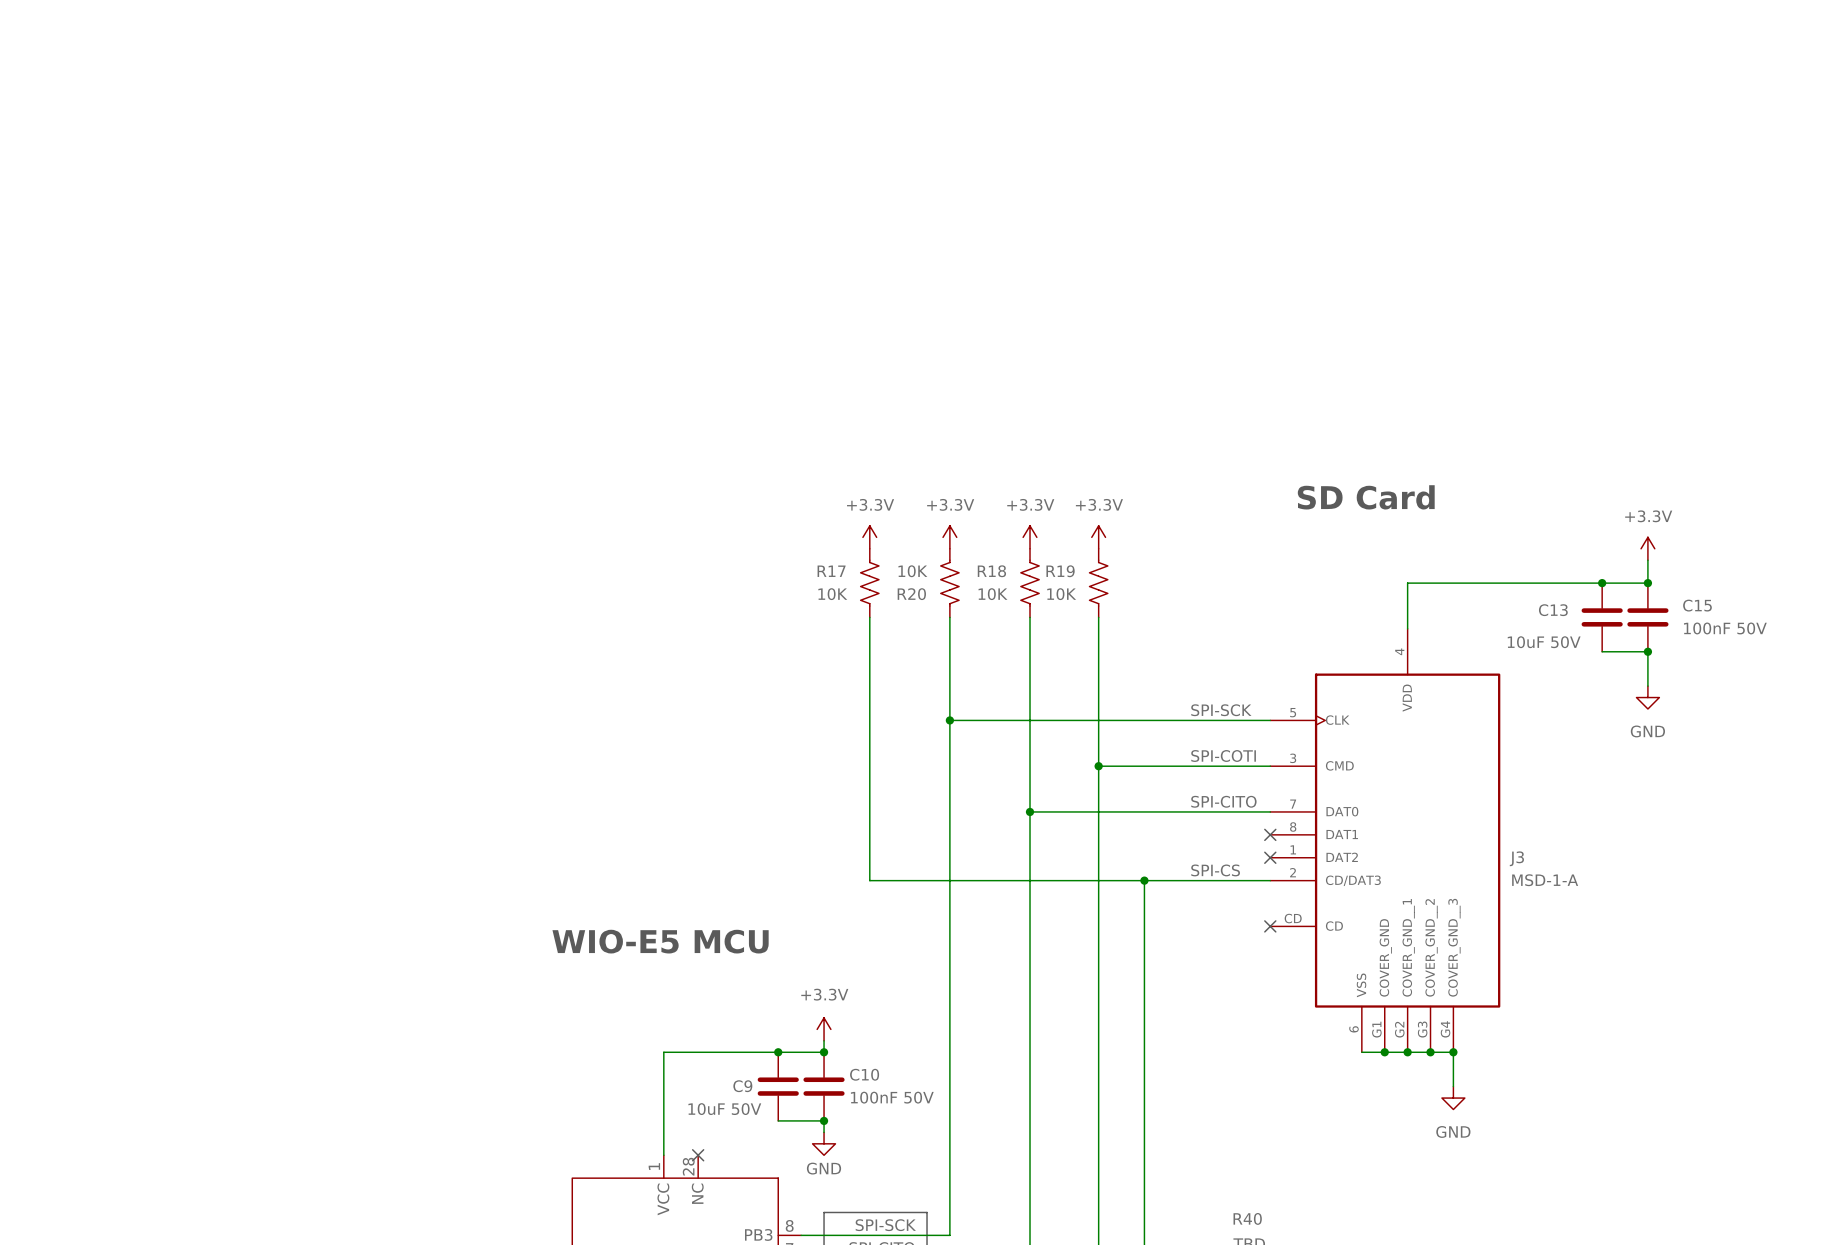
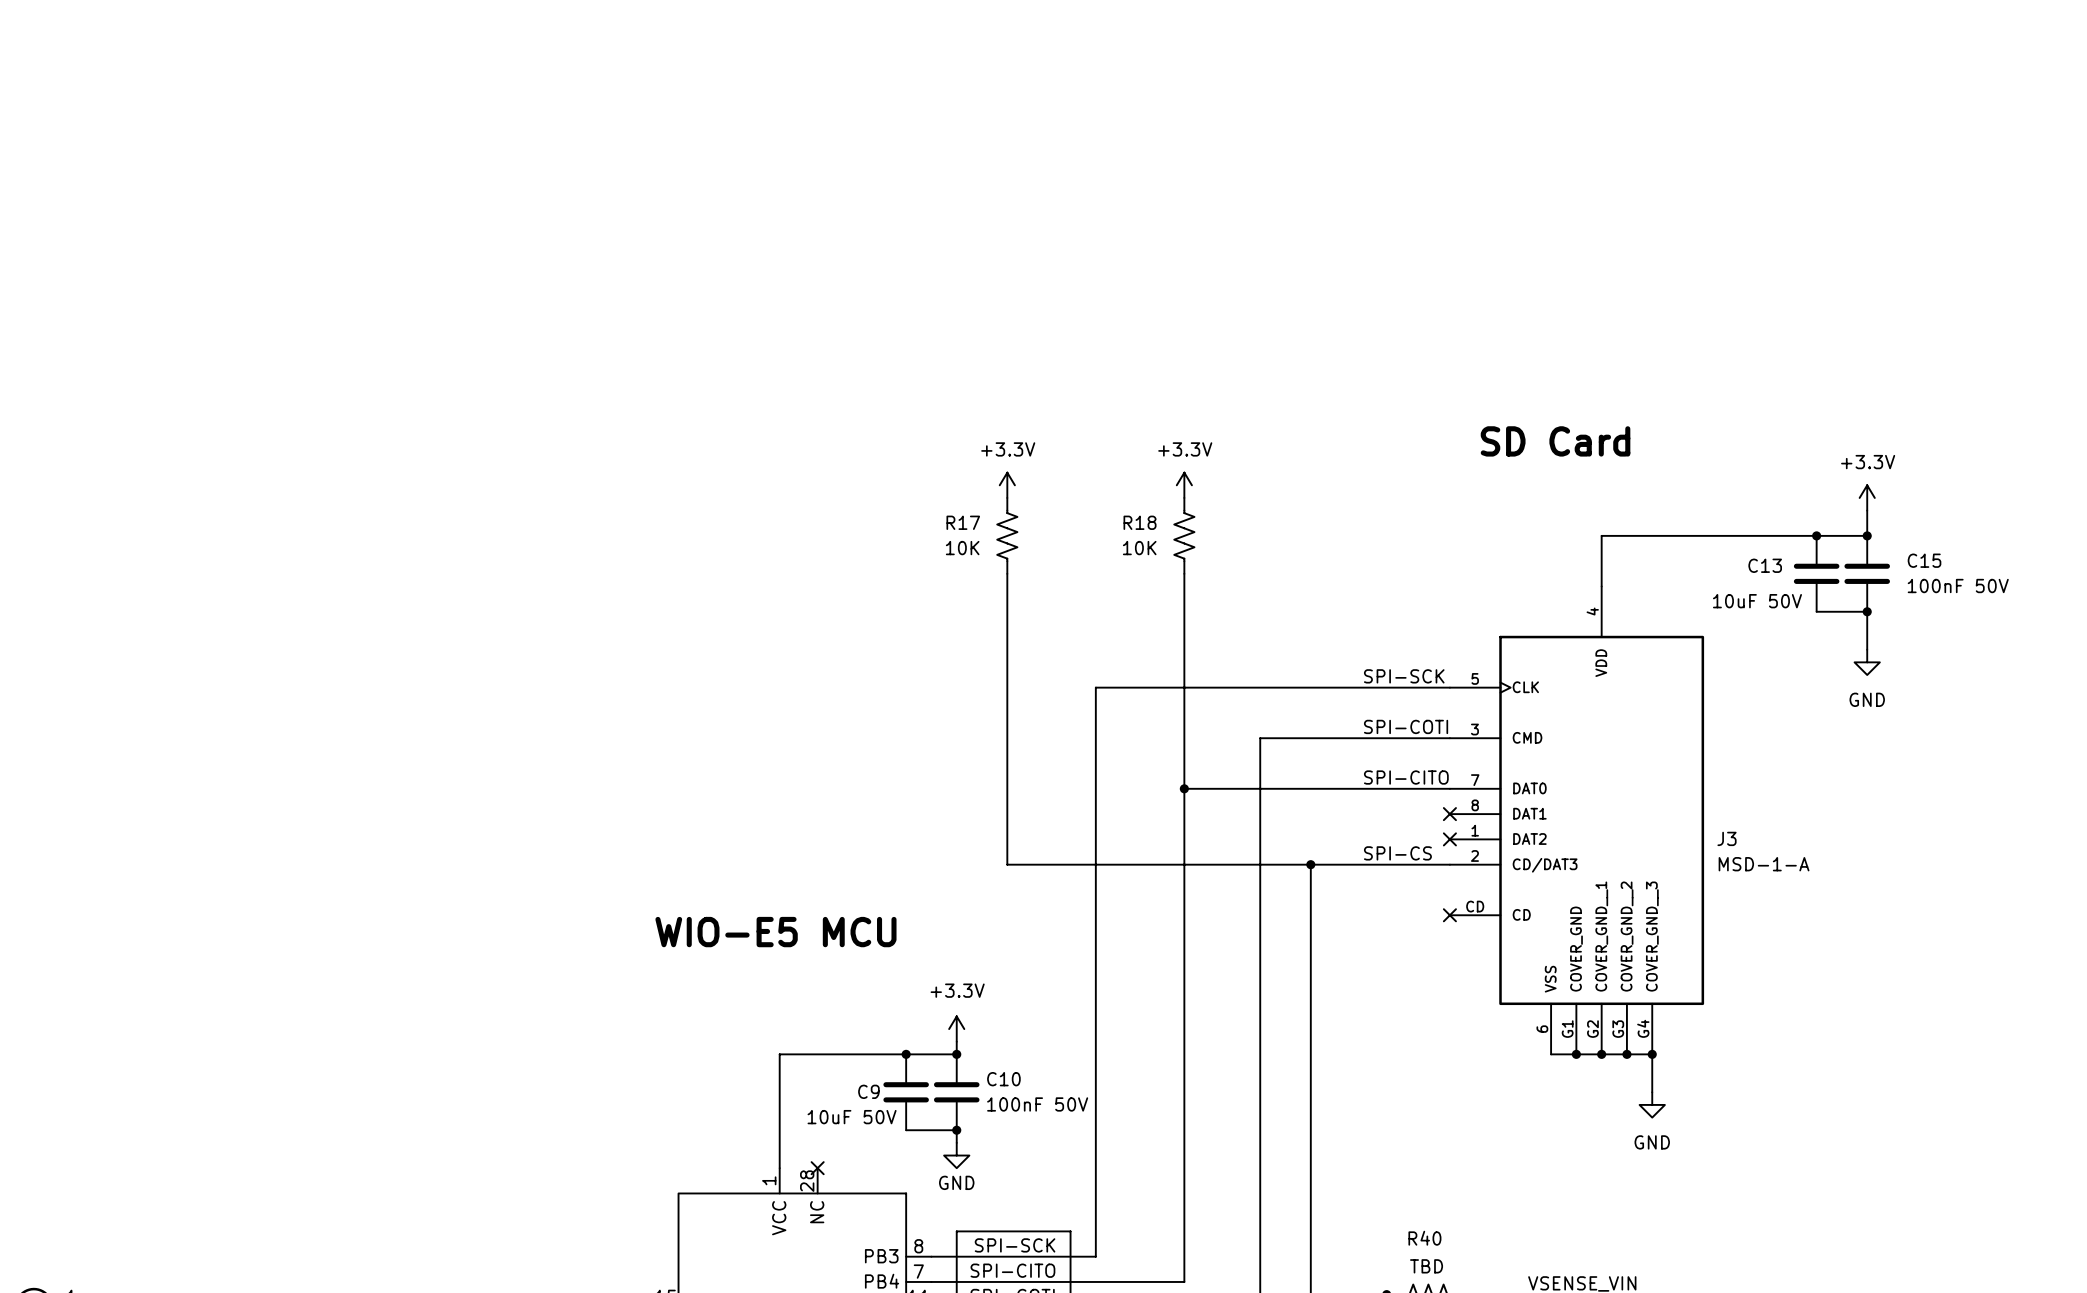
power symbol: +3.3V (949, 537) -> none
power symbol: +3.3V (1098, 537) -> none
R20: 10K (949, 583) -> none
R19: 10K (1098, 583) -> none
wire: (949, 617) (949, 720) -> none
wire: (1098, 617) (1098, 766) -> none
junction: (949, 720) -> none
junction: (1098, 766) -> none

